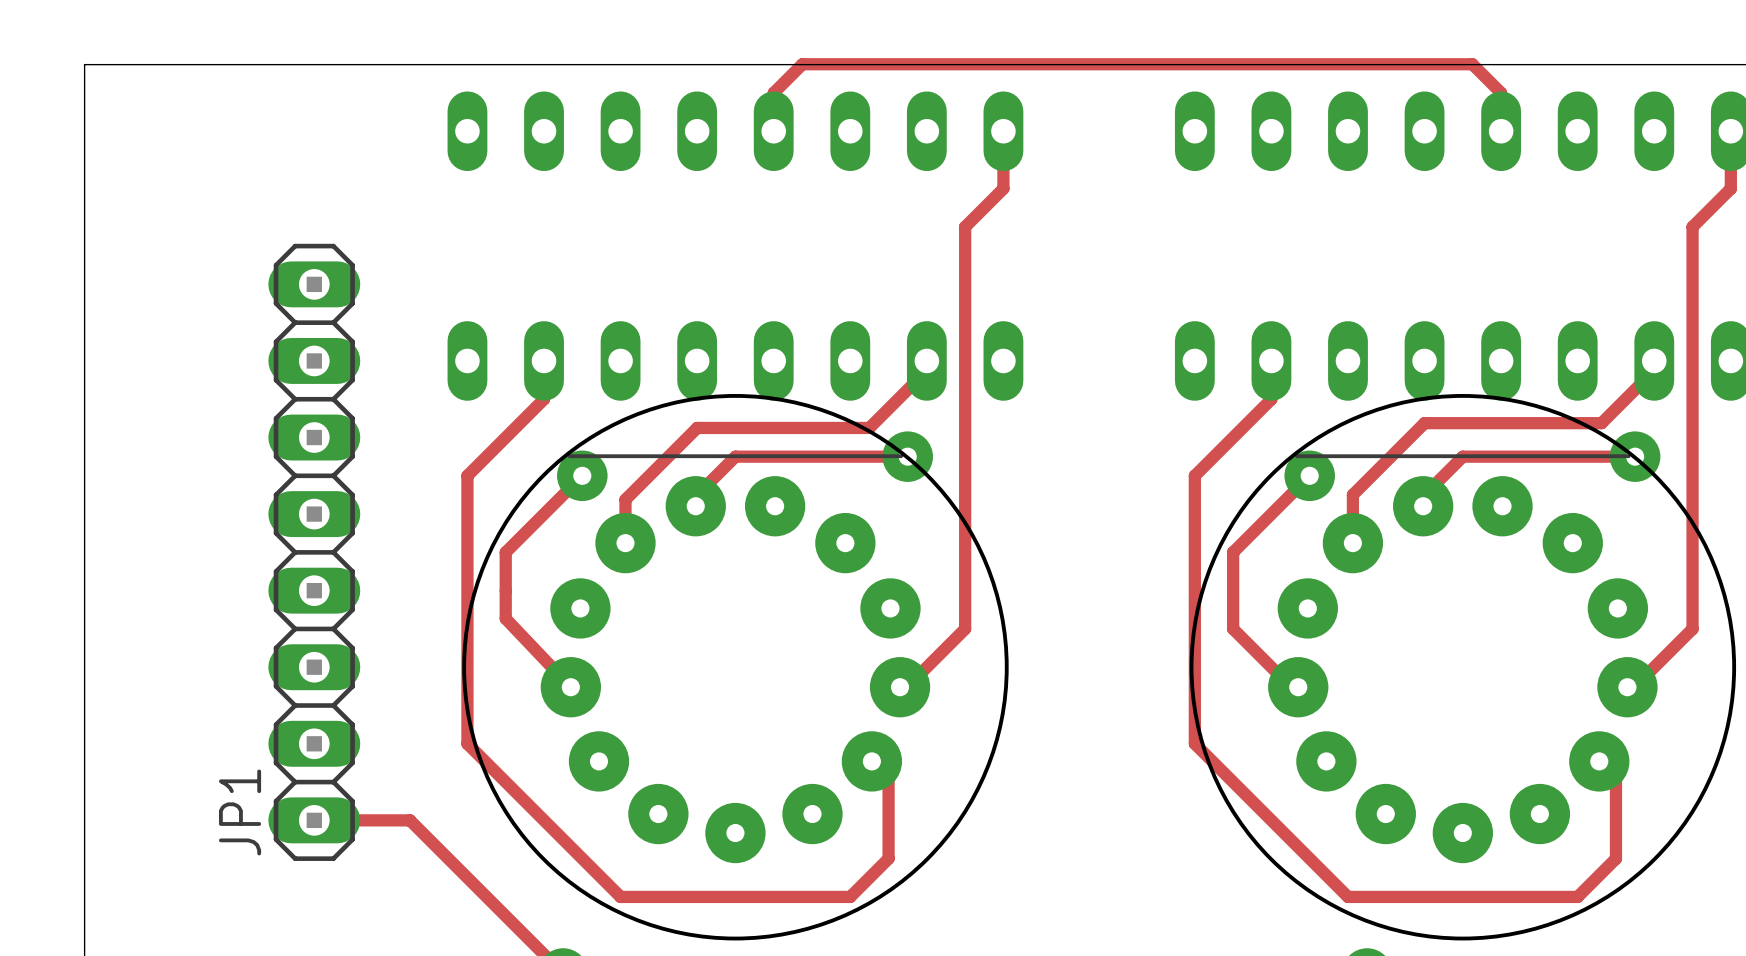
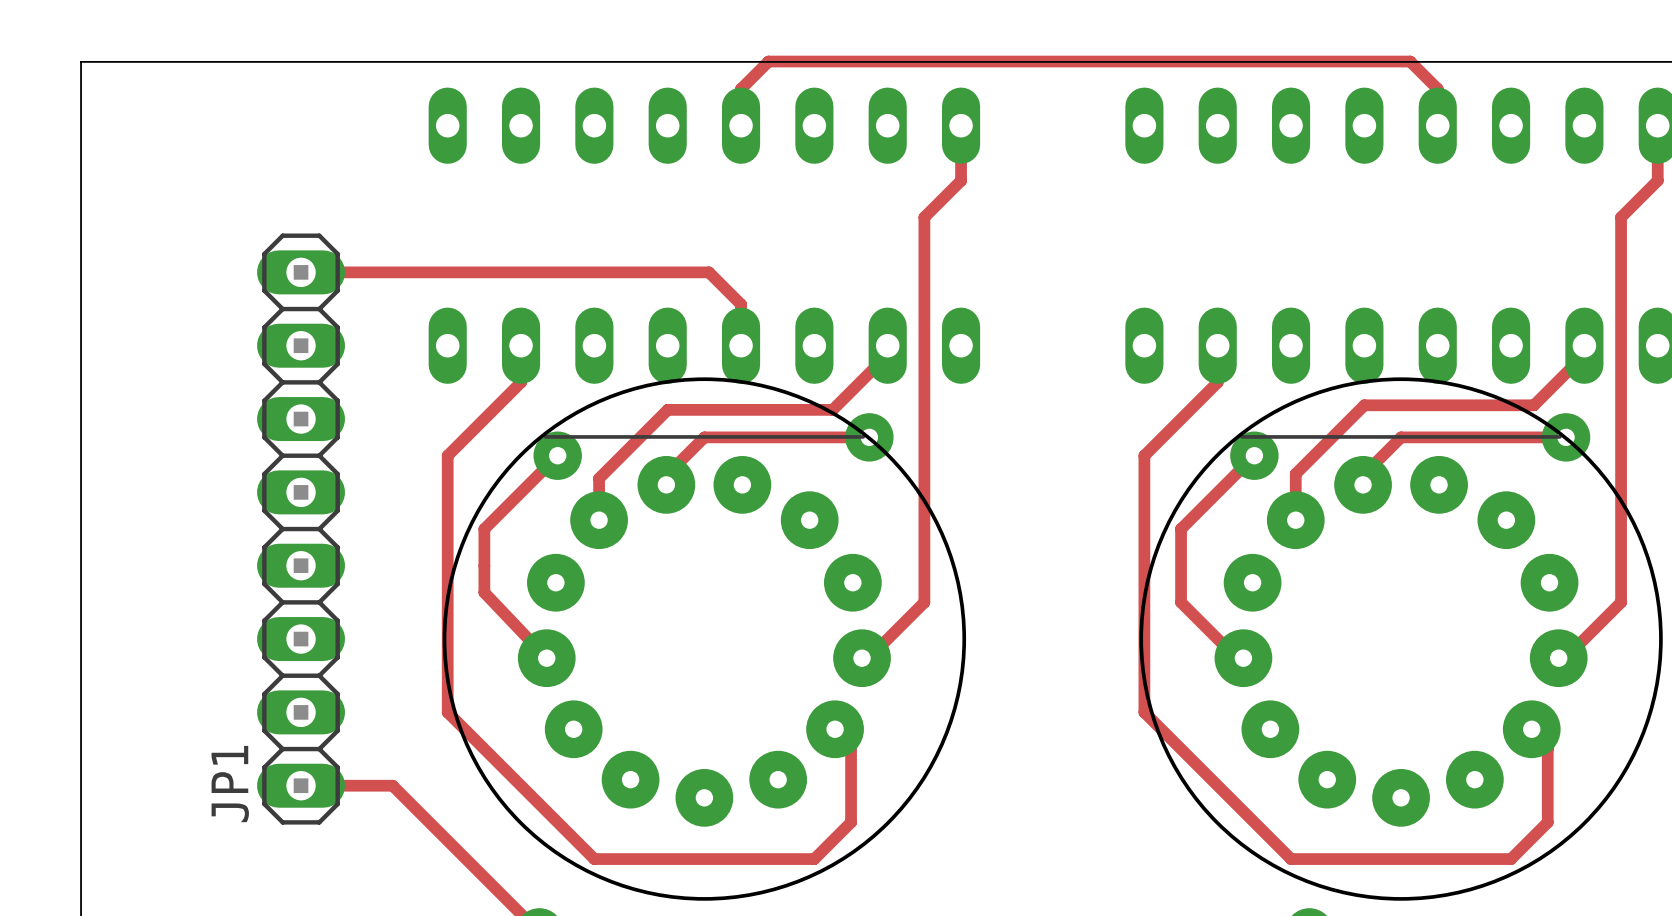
track: none -> (301, 272) (708, 272) (741, 304) (741, 345)

